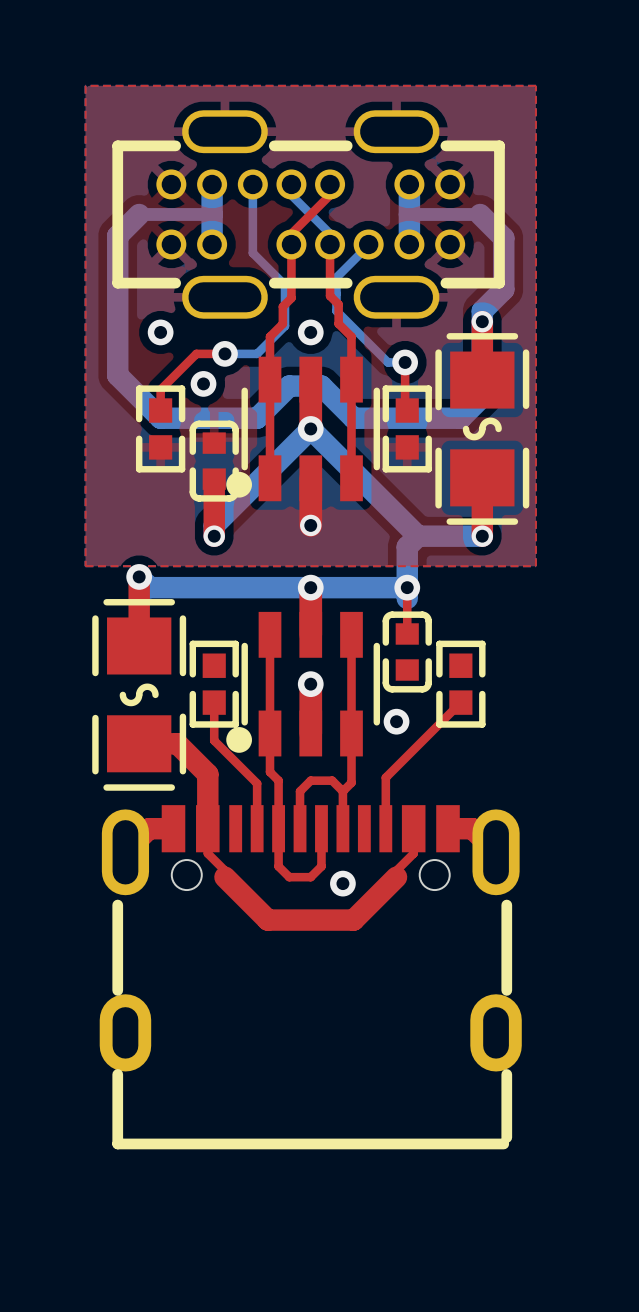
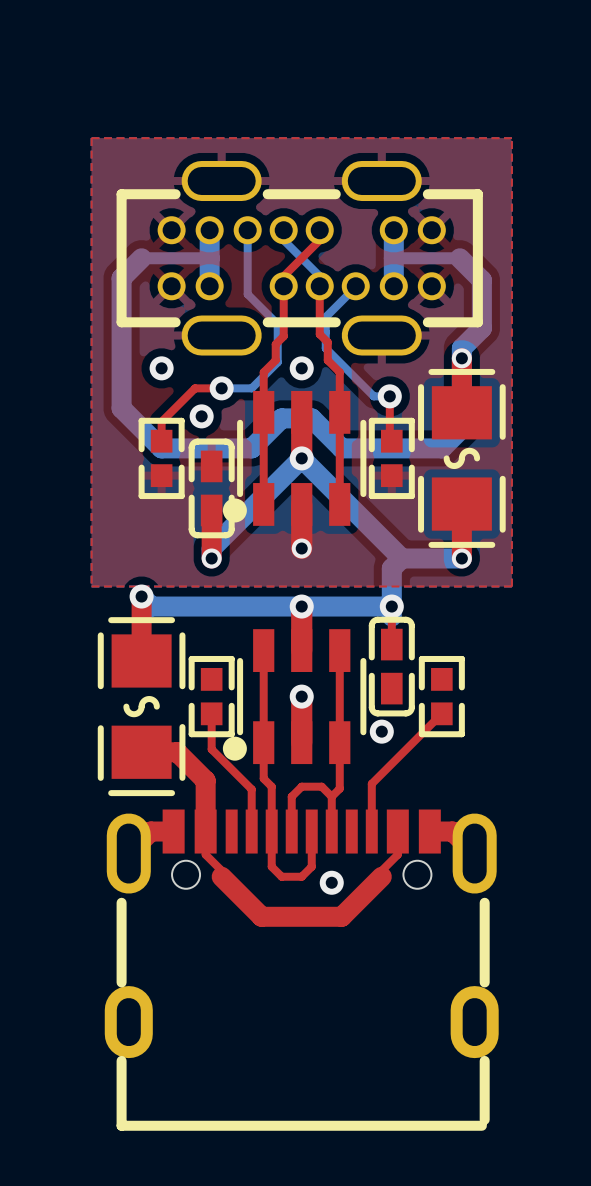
part footprint: [189, 420, 239, 502] -> [188, 438, 235, 539]
part footprint: [382, 611, 432, 693] -> [368, 616, 415, 717]

